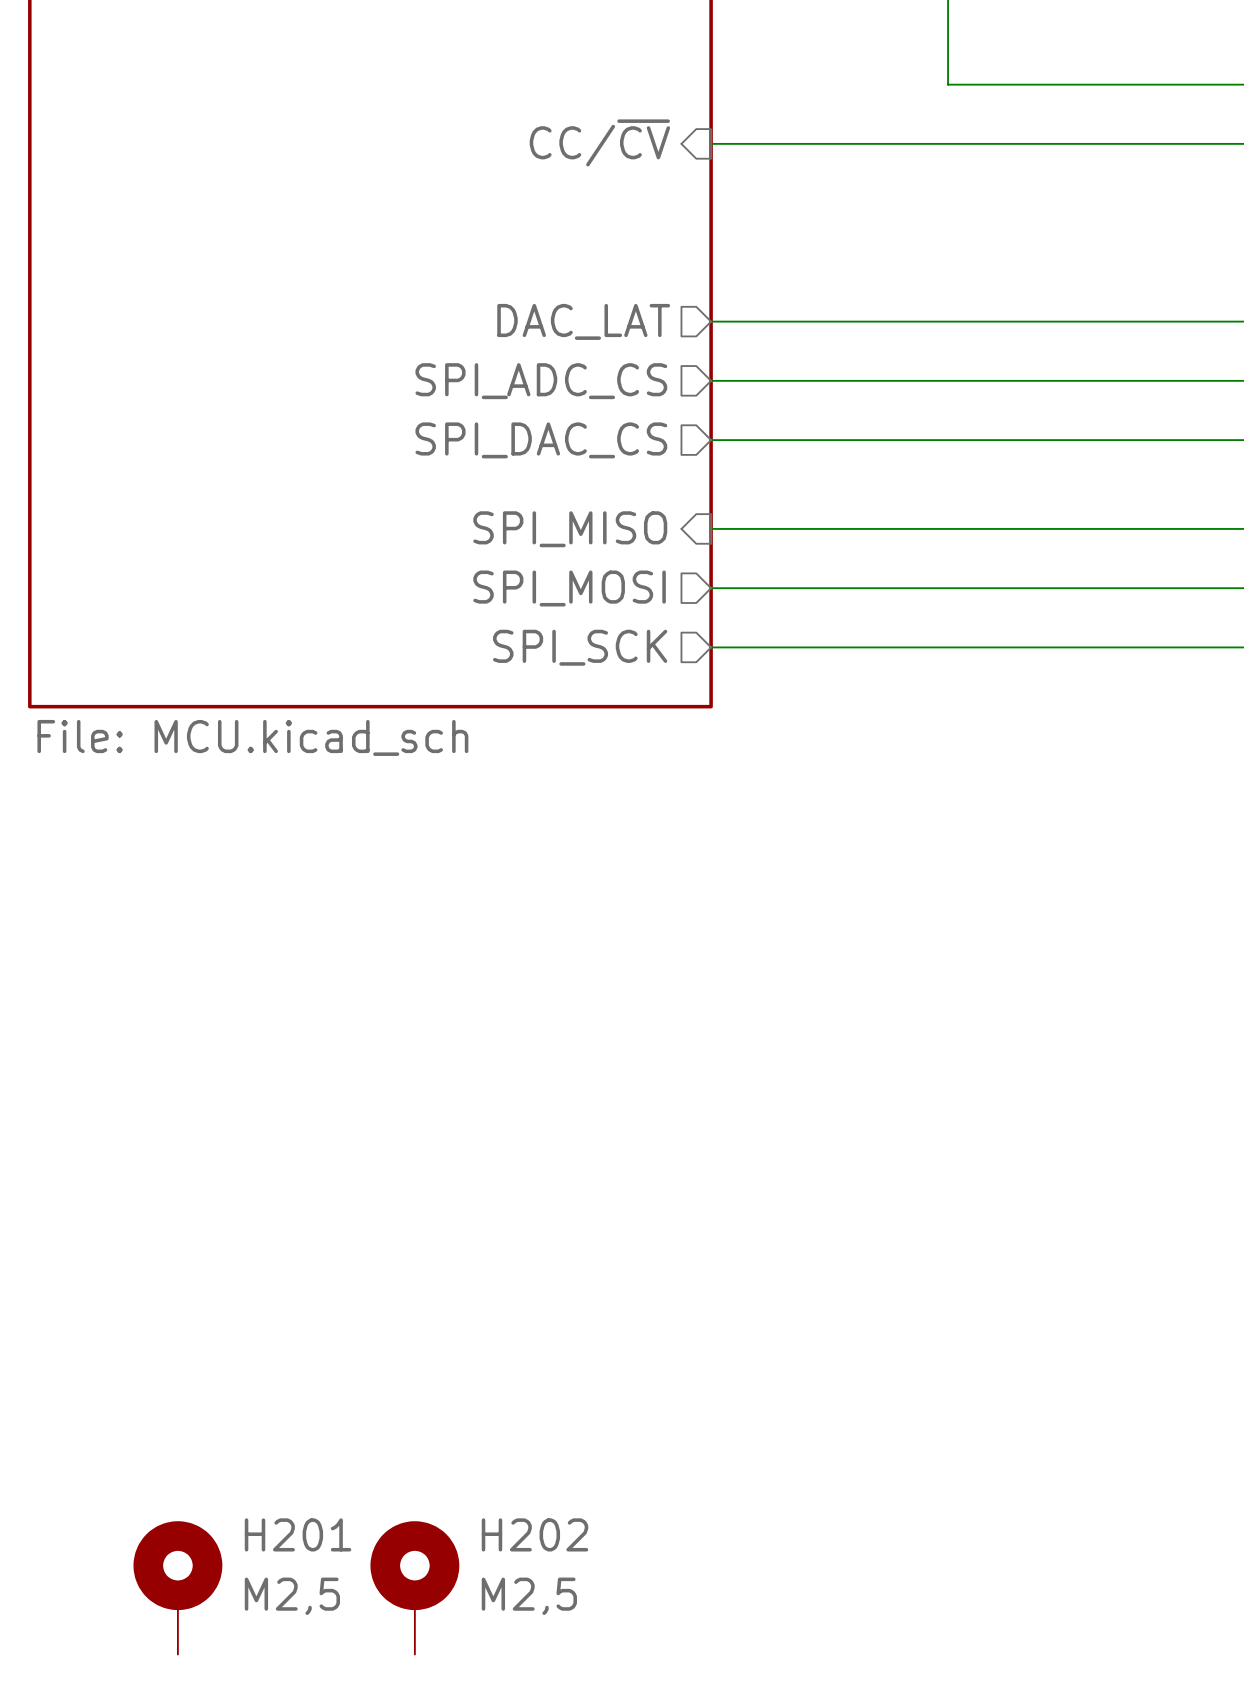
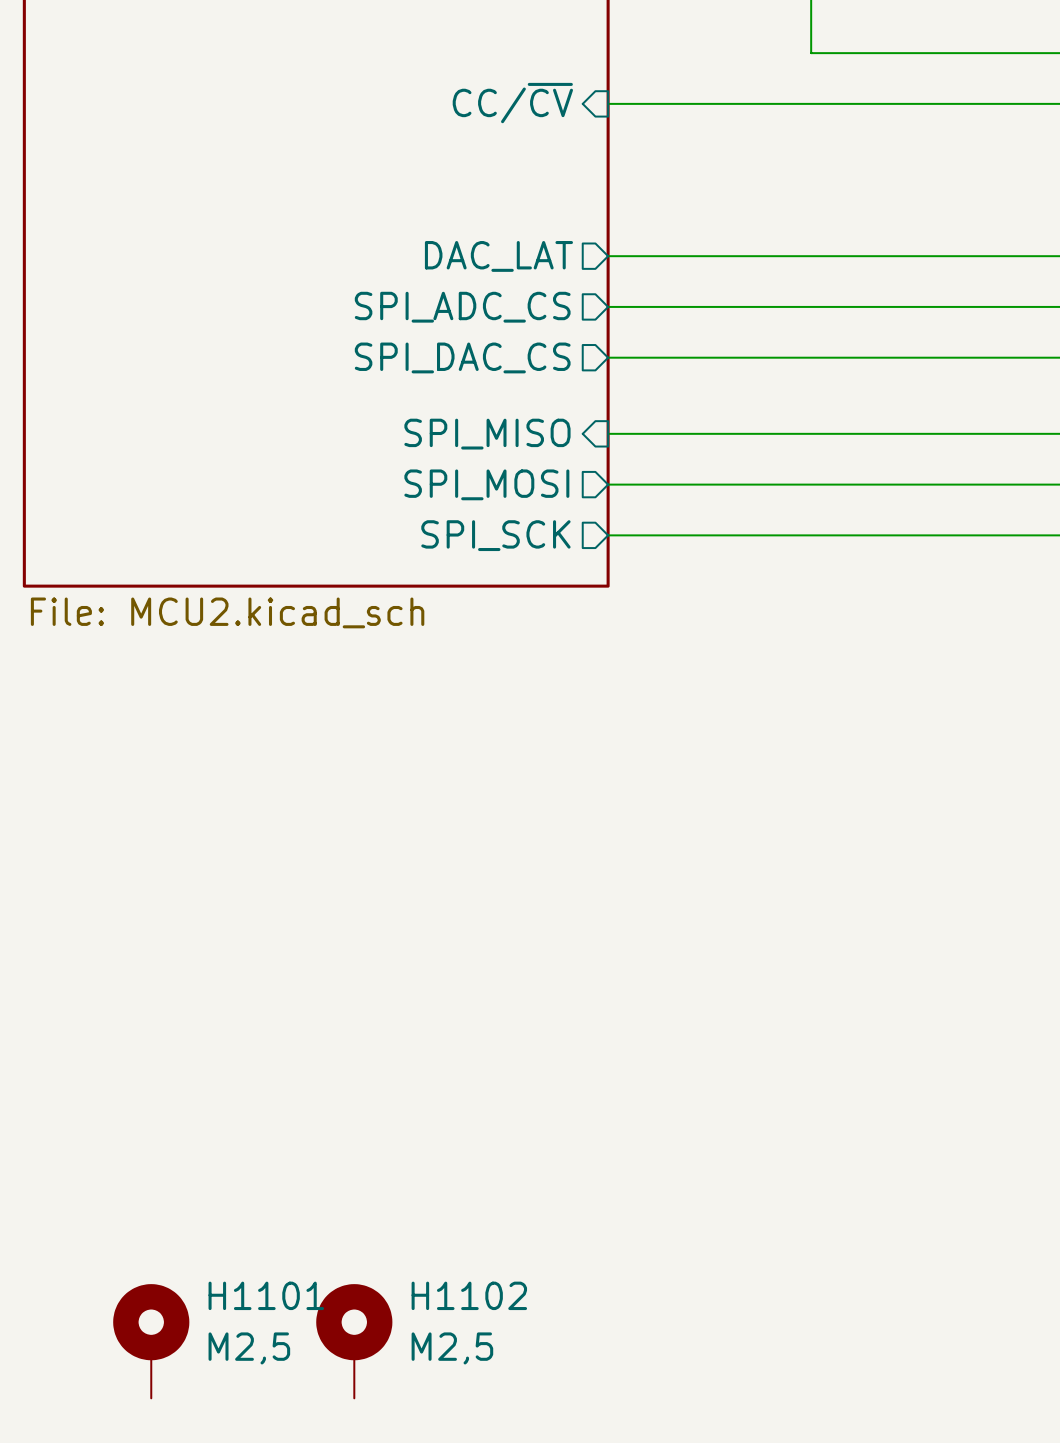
sheet value: File: MCU.kicad_sch (252, 737) -> File: MCU2.kicad_sch (227, 612)
H201 name: H201 (298, 1534) -> H1101 (266, 1295)
H202 name: H202 (534, 1534) -> H1102 (469, 1295)

